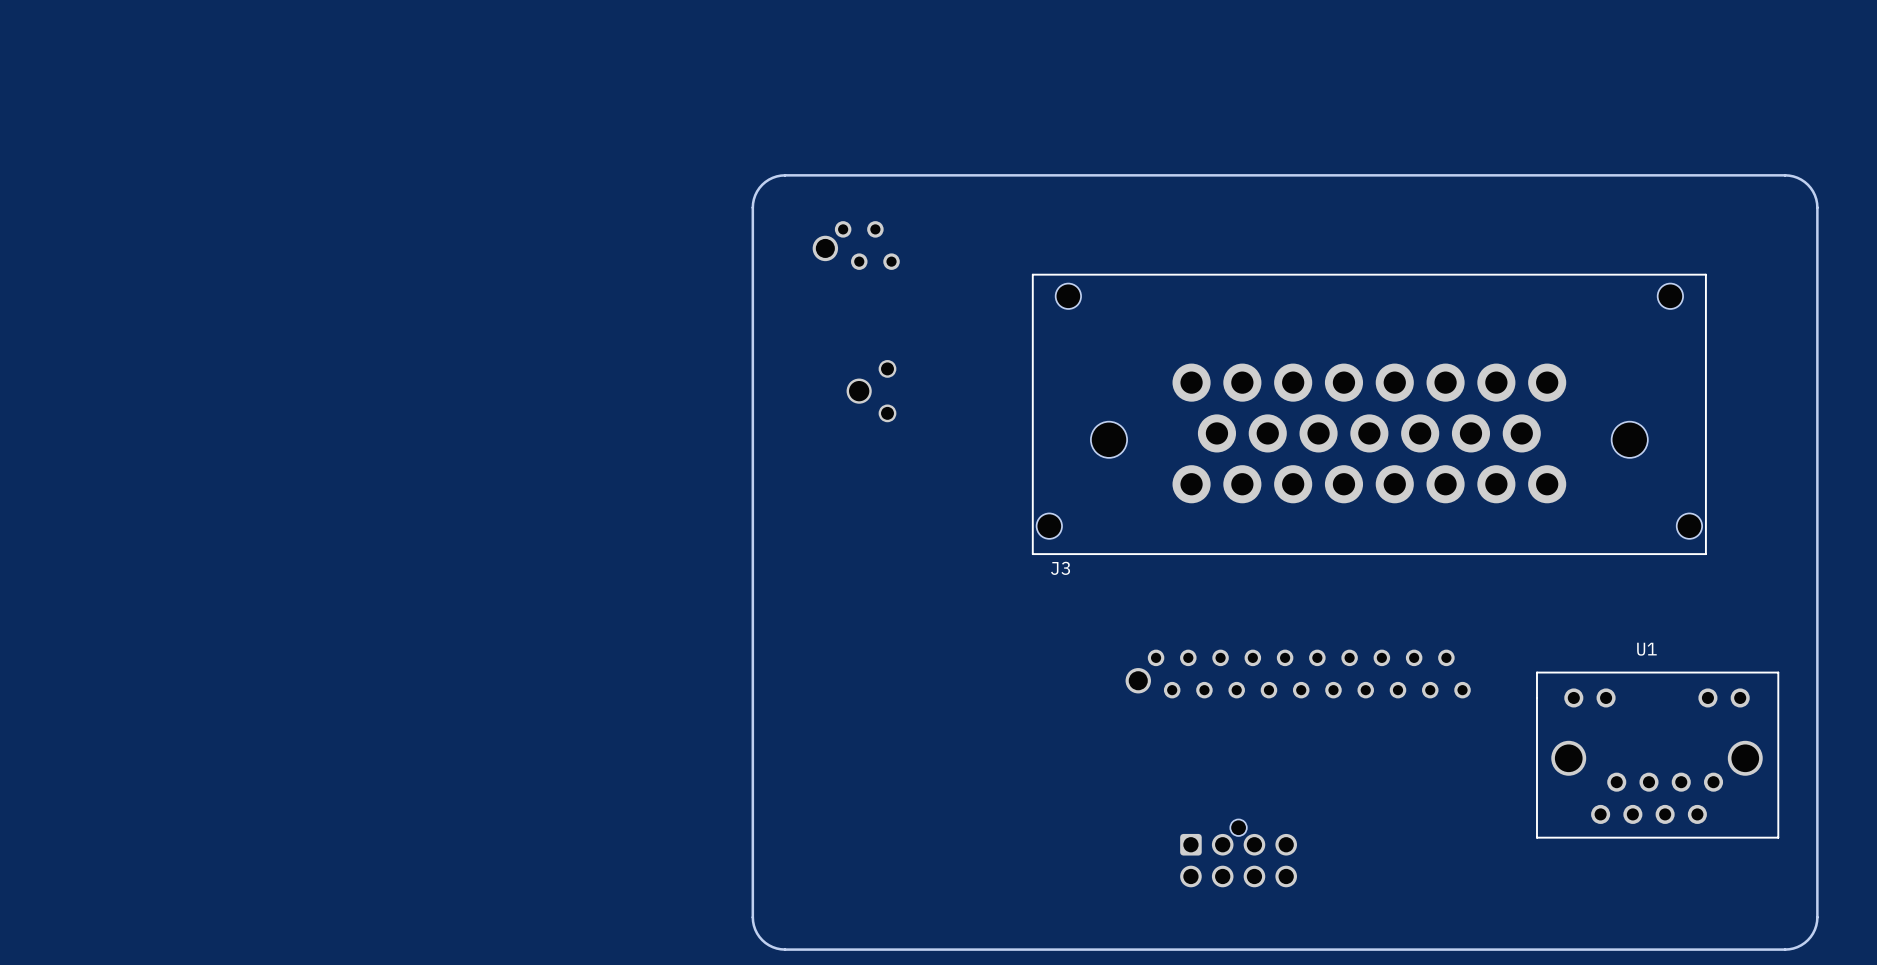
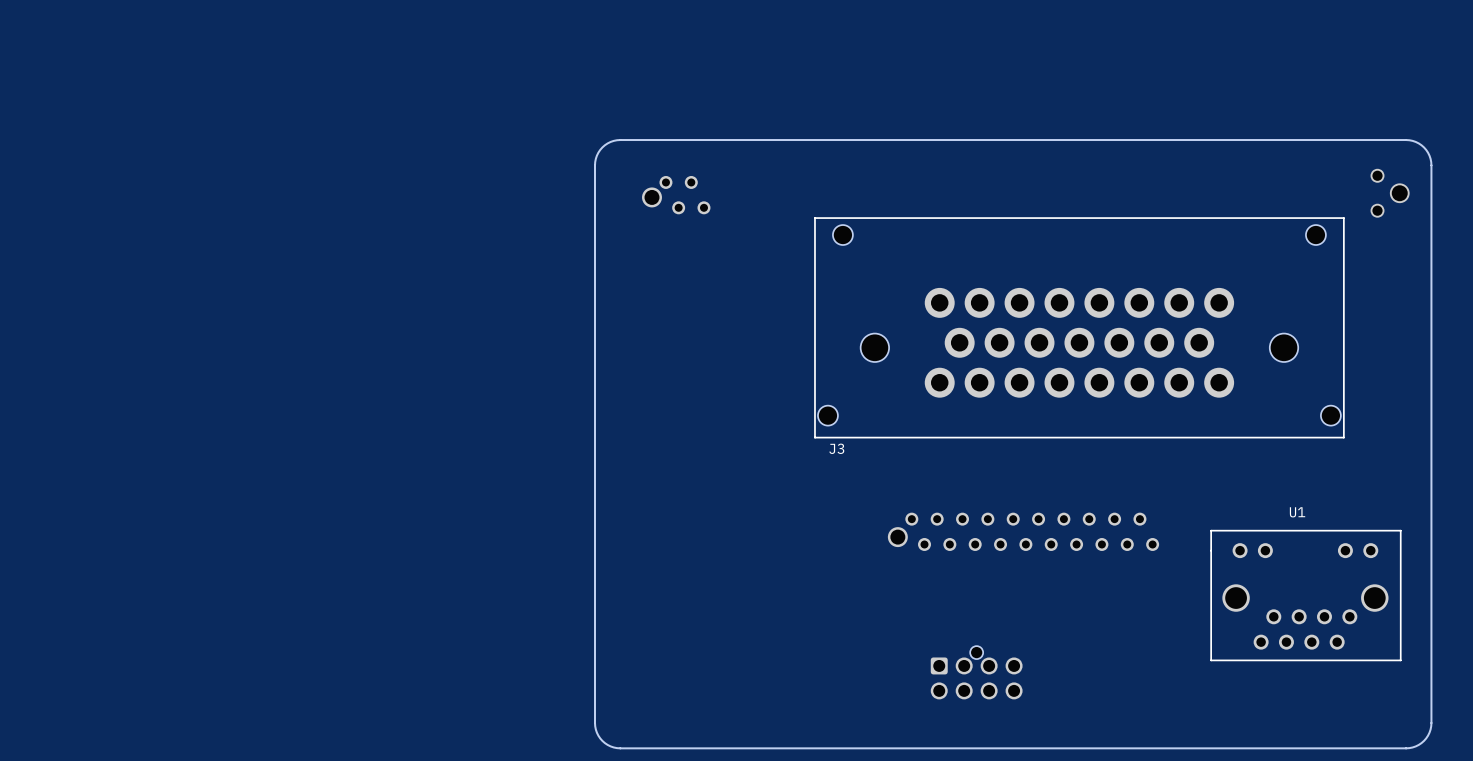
part: none -> (1390, 193)
part: (871, 391) -> none

